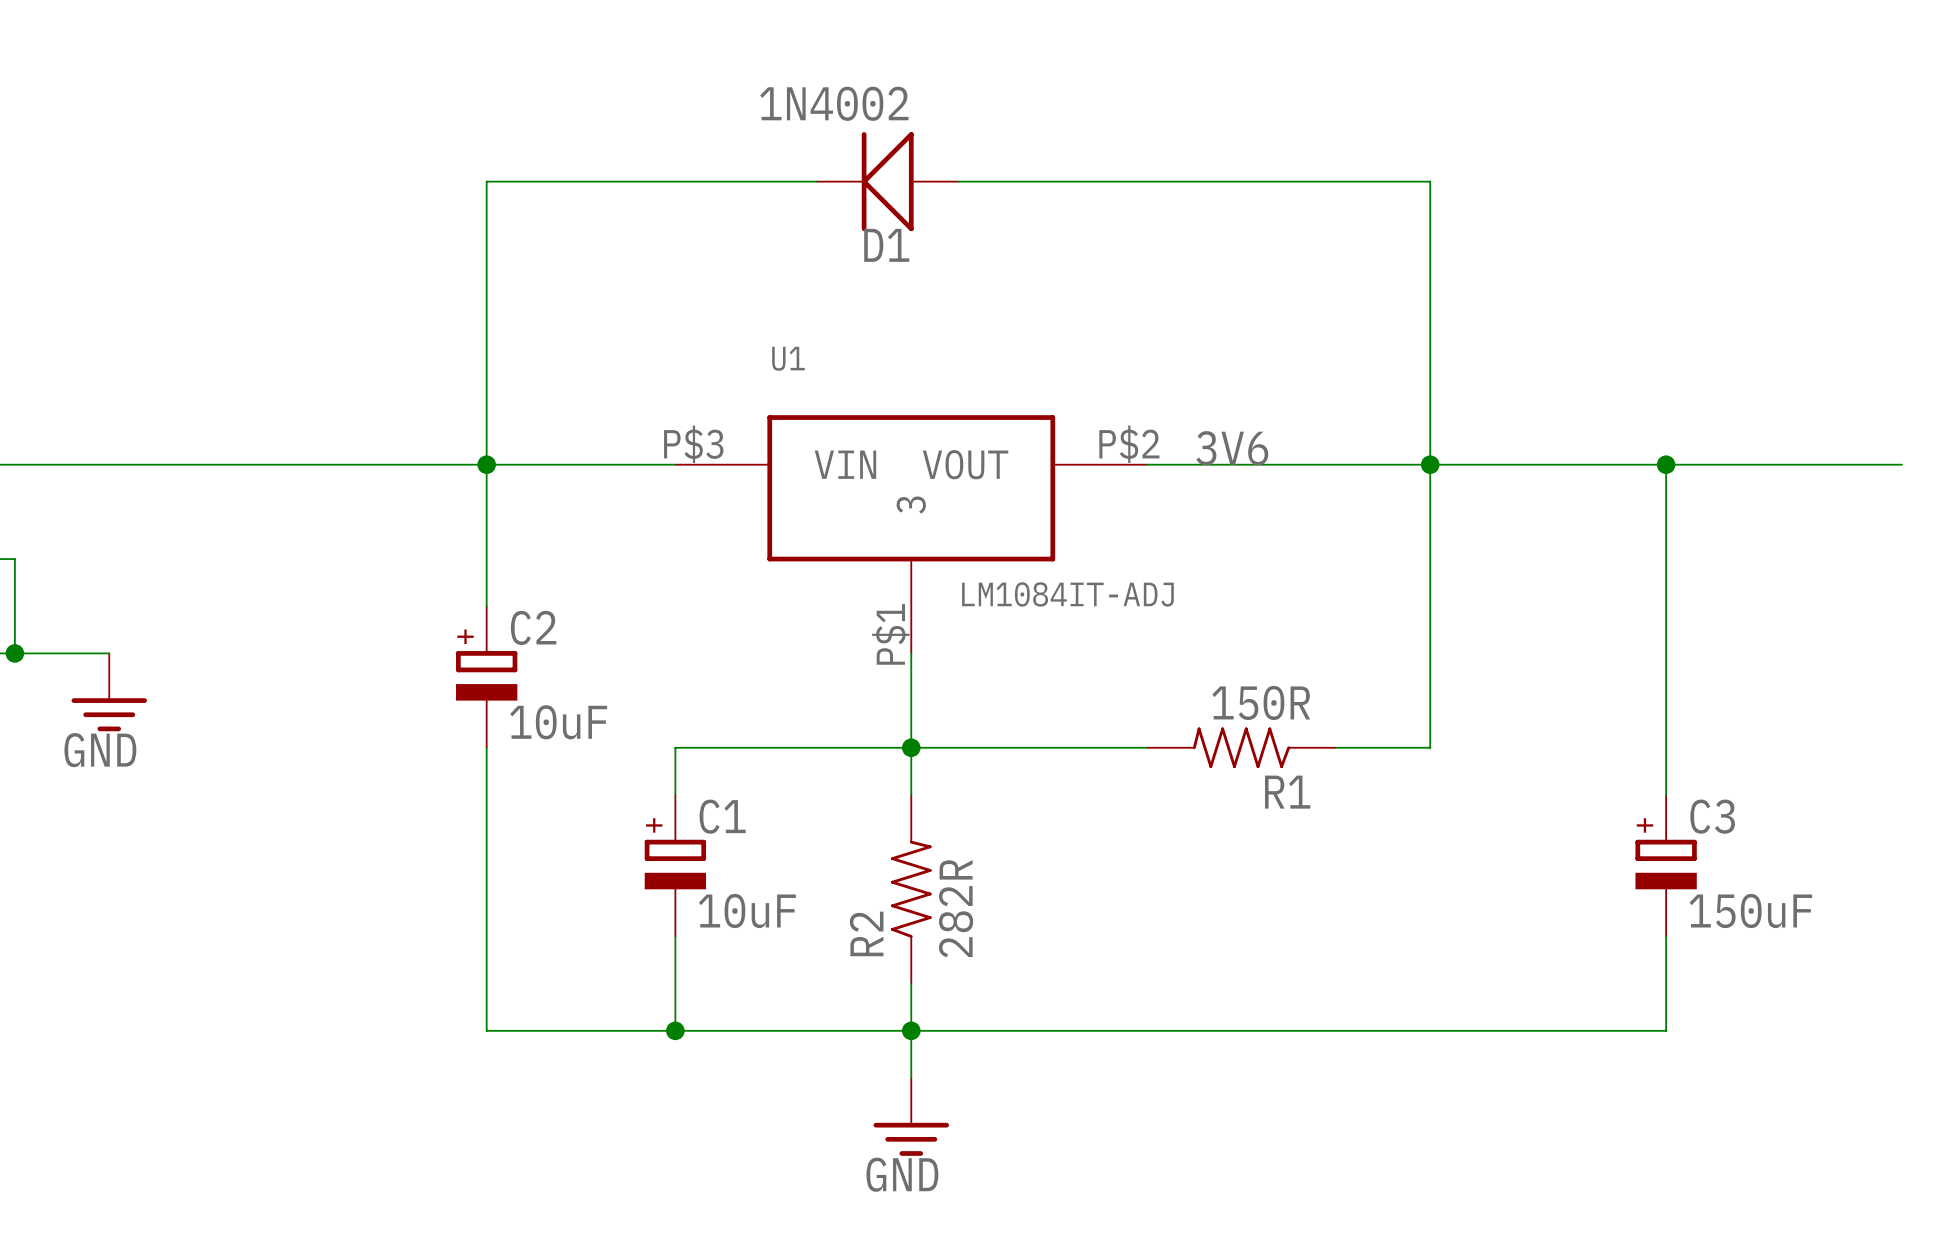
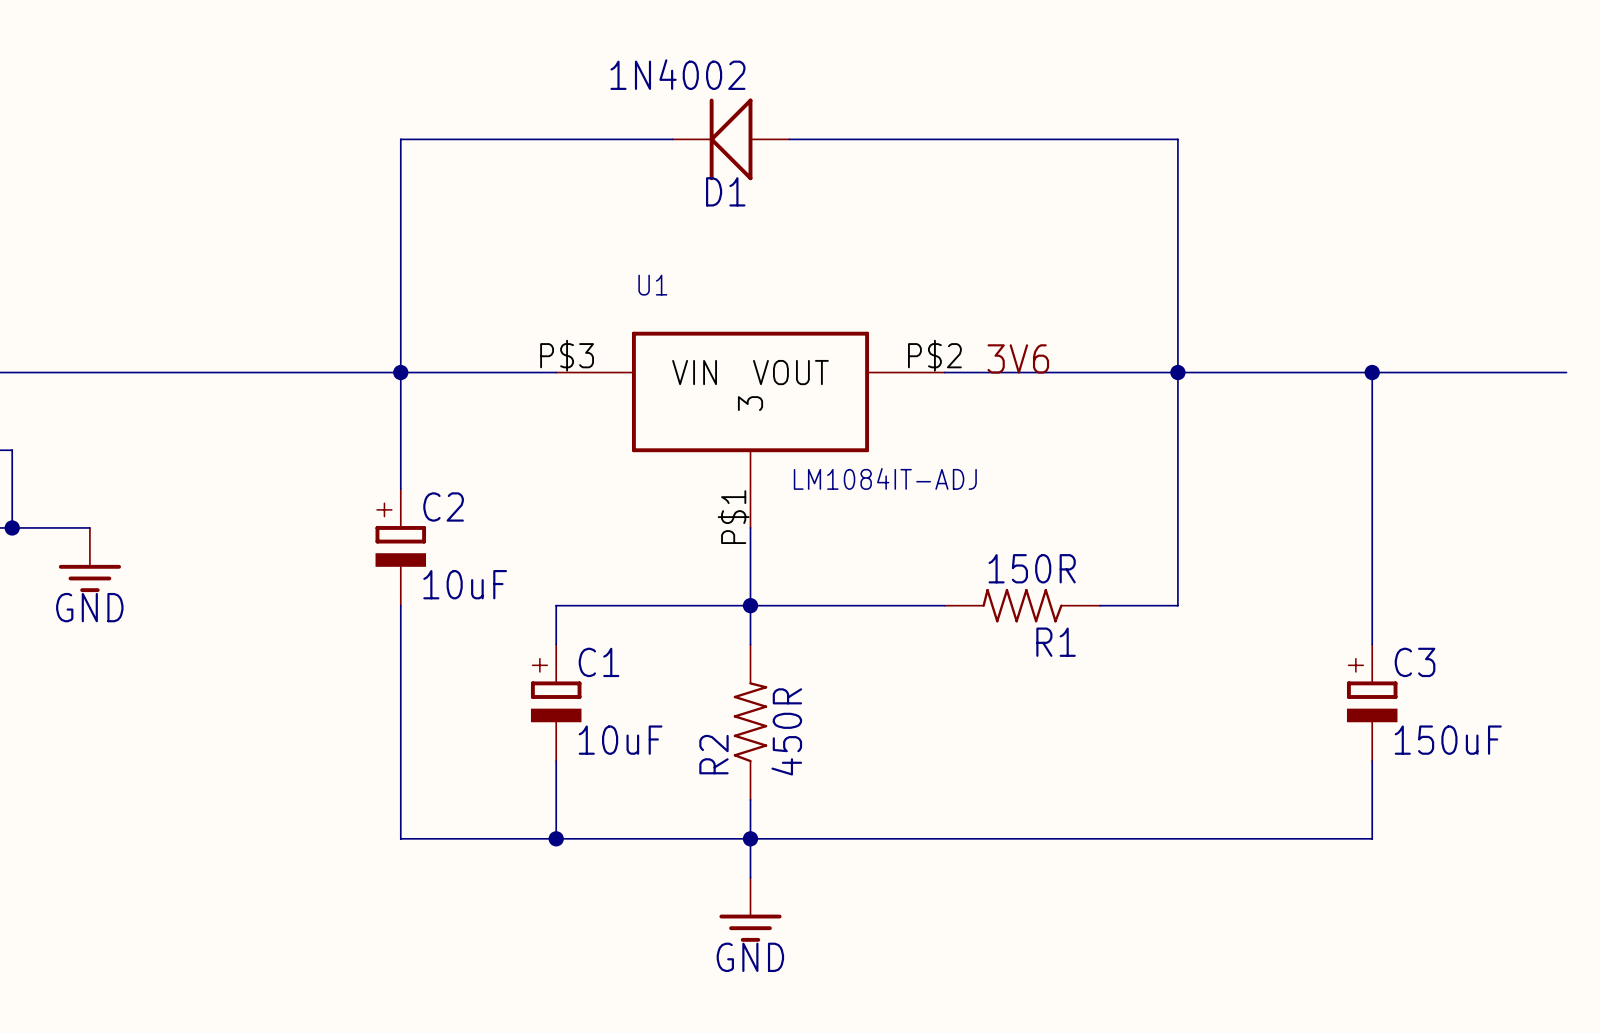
R2 value: 282R (956, 908) -> 450R (786, 731)

